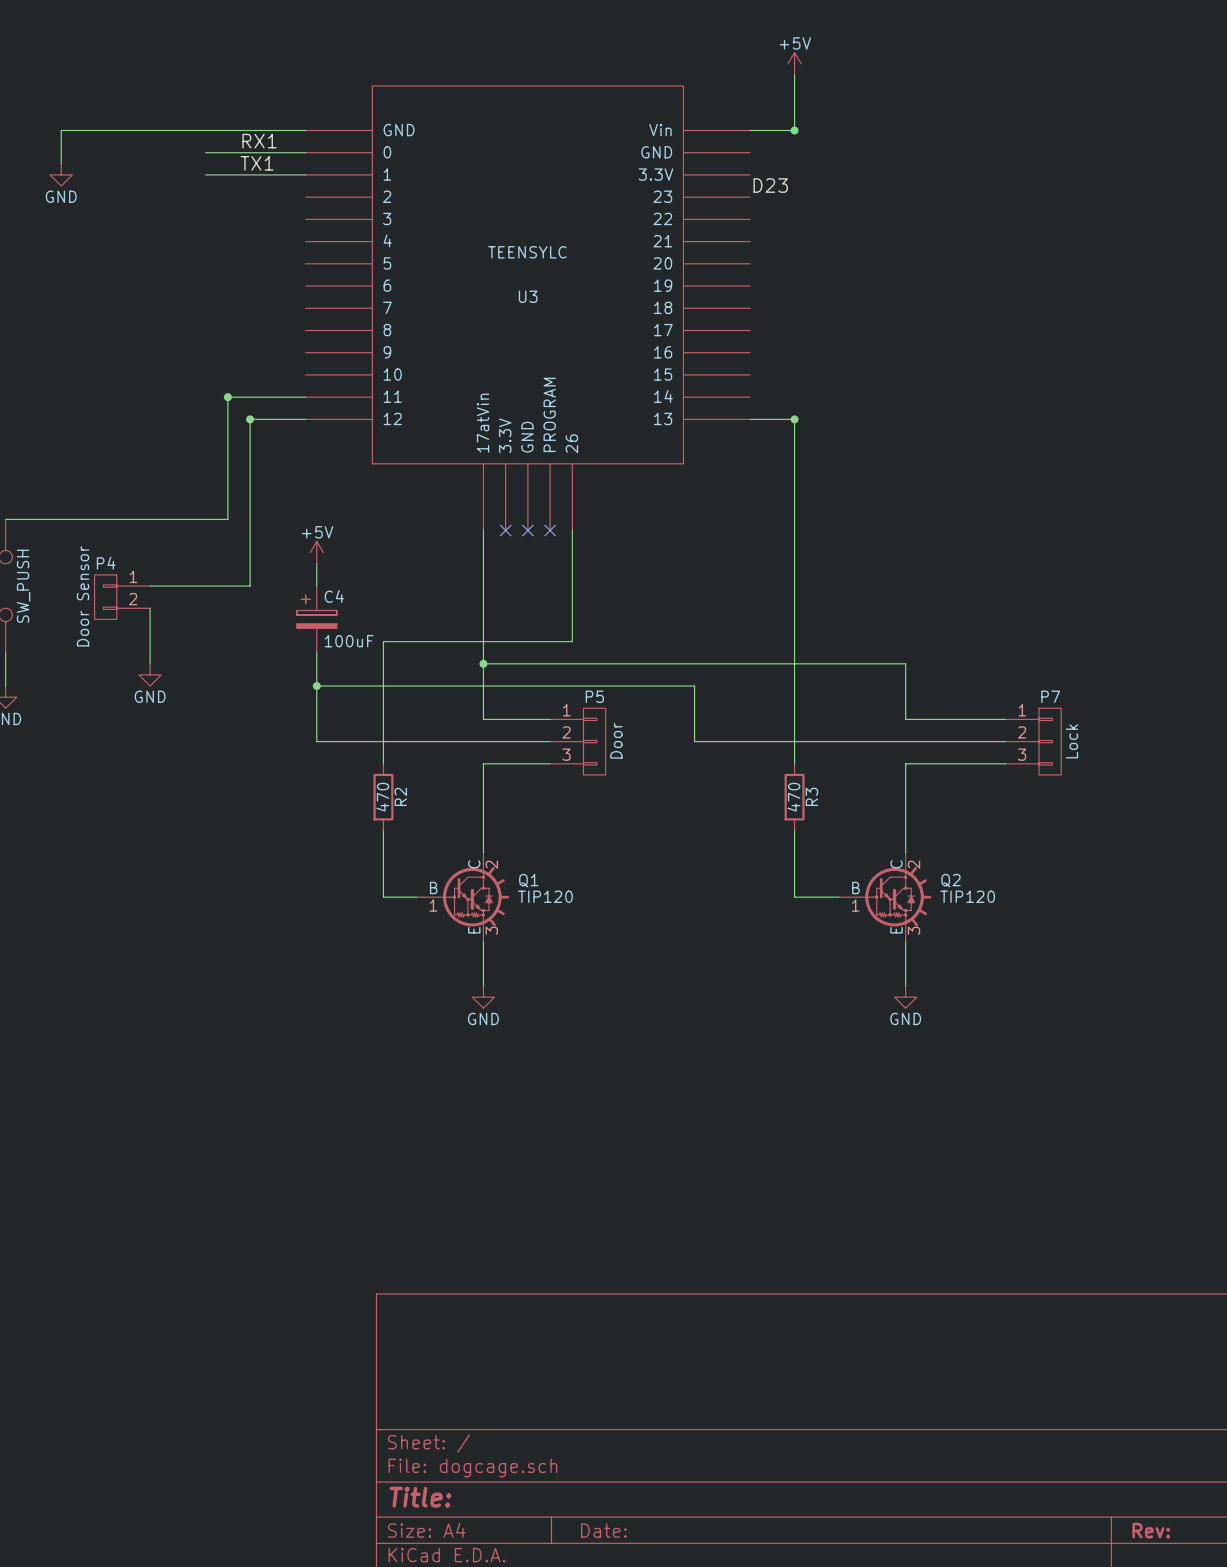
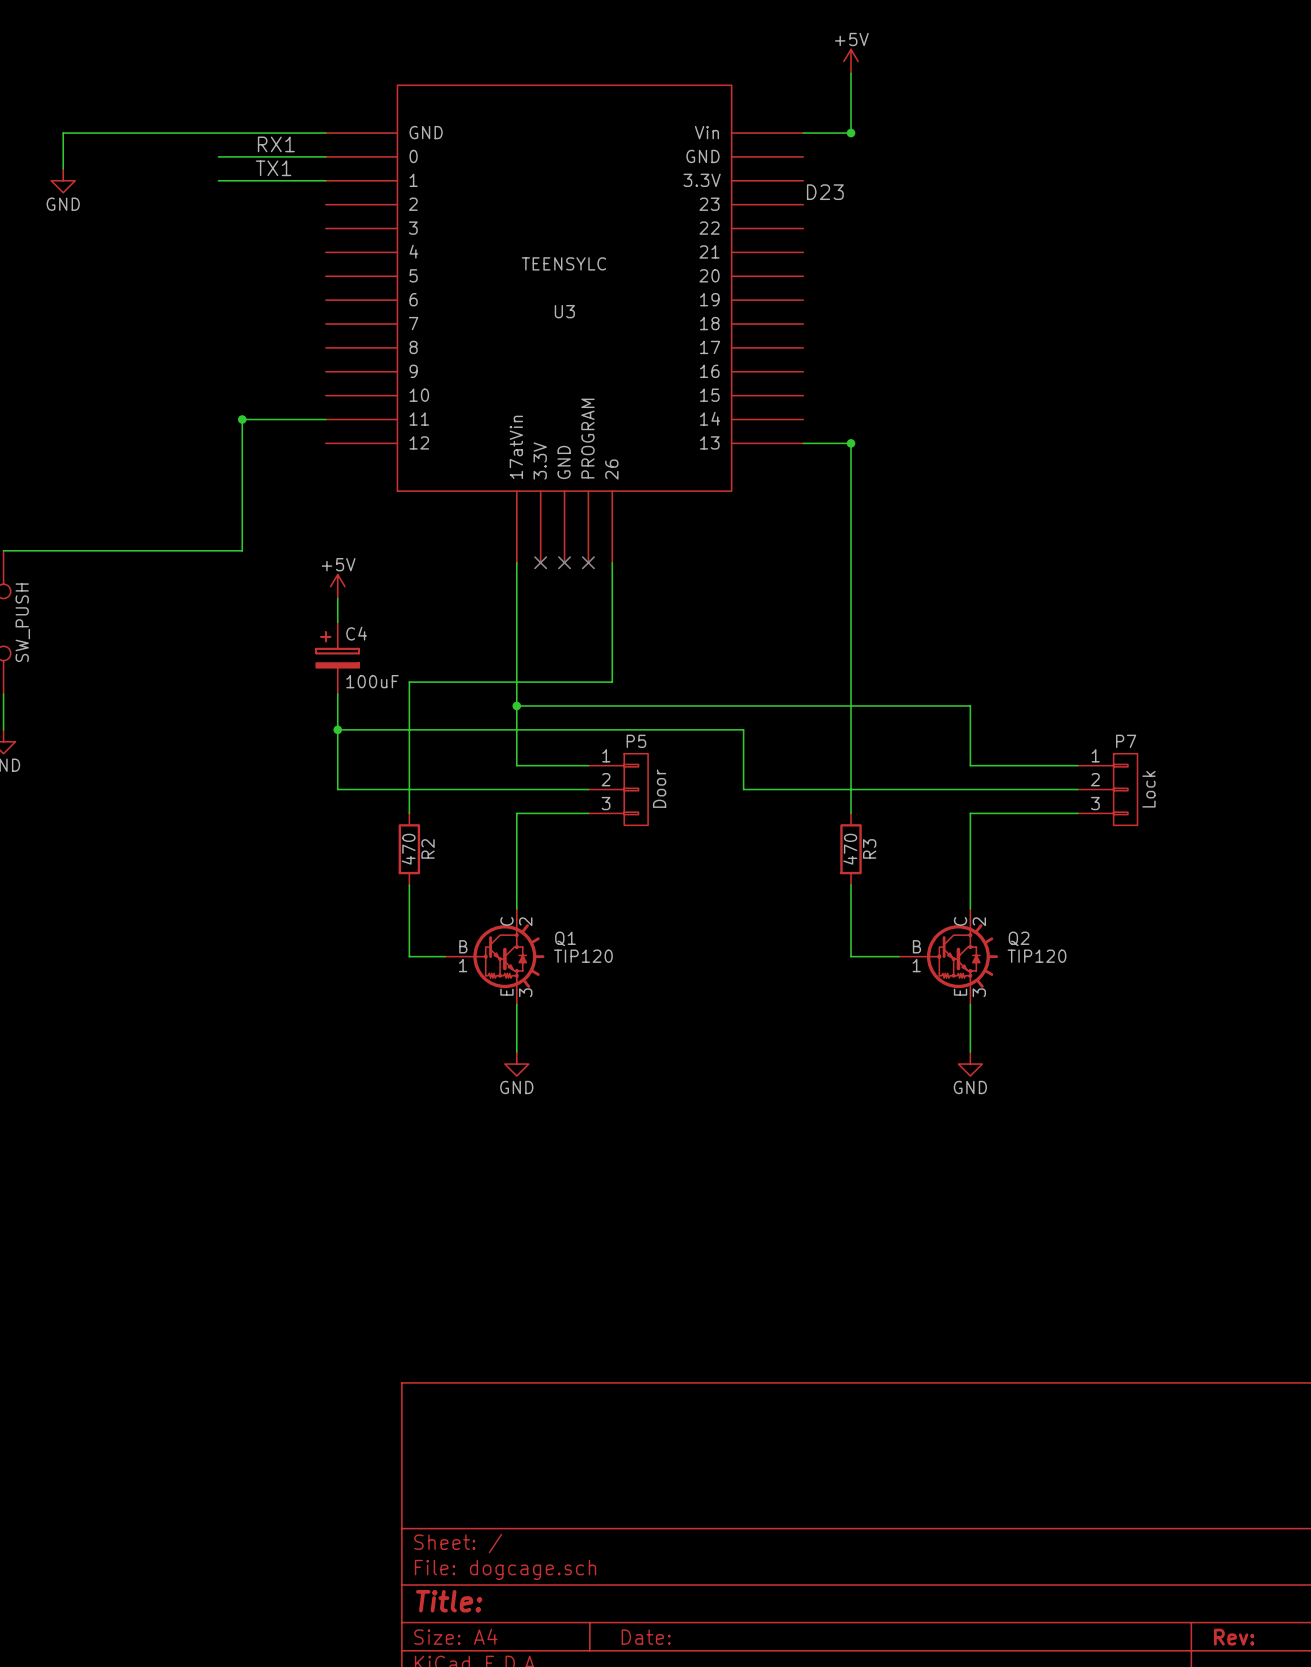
junction: (250, 419) -> none
wire: (305, 419) (250, 419) (250, 586) (150, 586) -> none
P4: Door Sensor (122, 597) -> none
wire: (150, 608) (150, 663) -> none
power symbol: GND (150, 674) -> none

